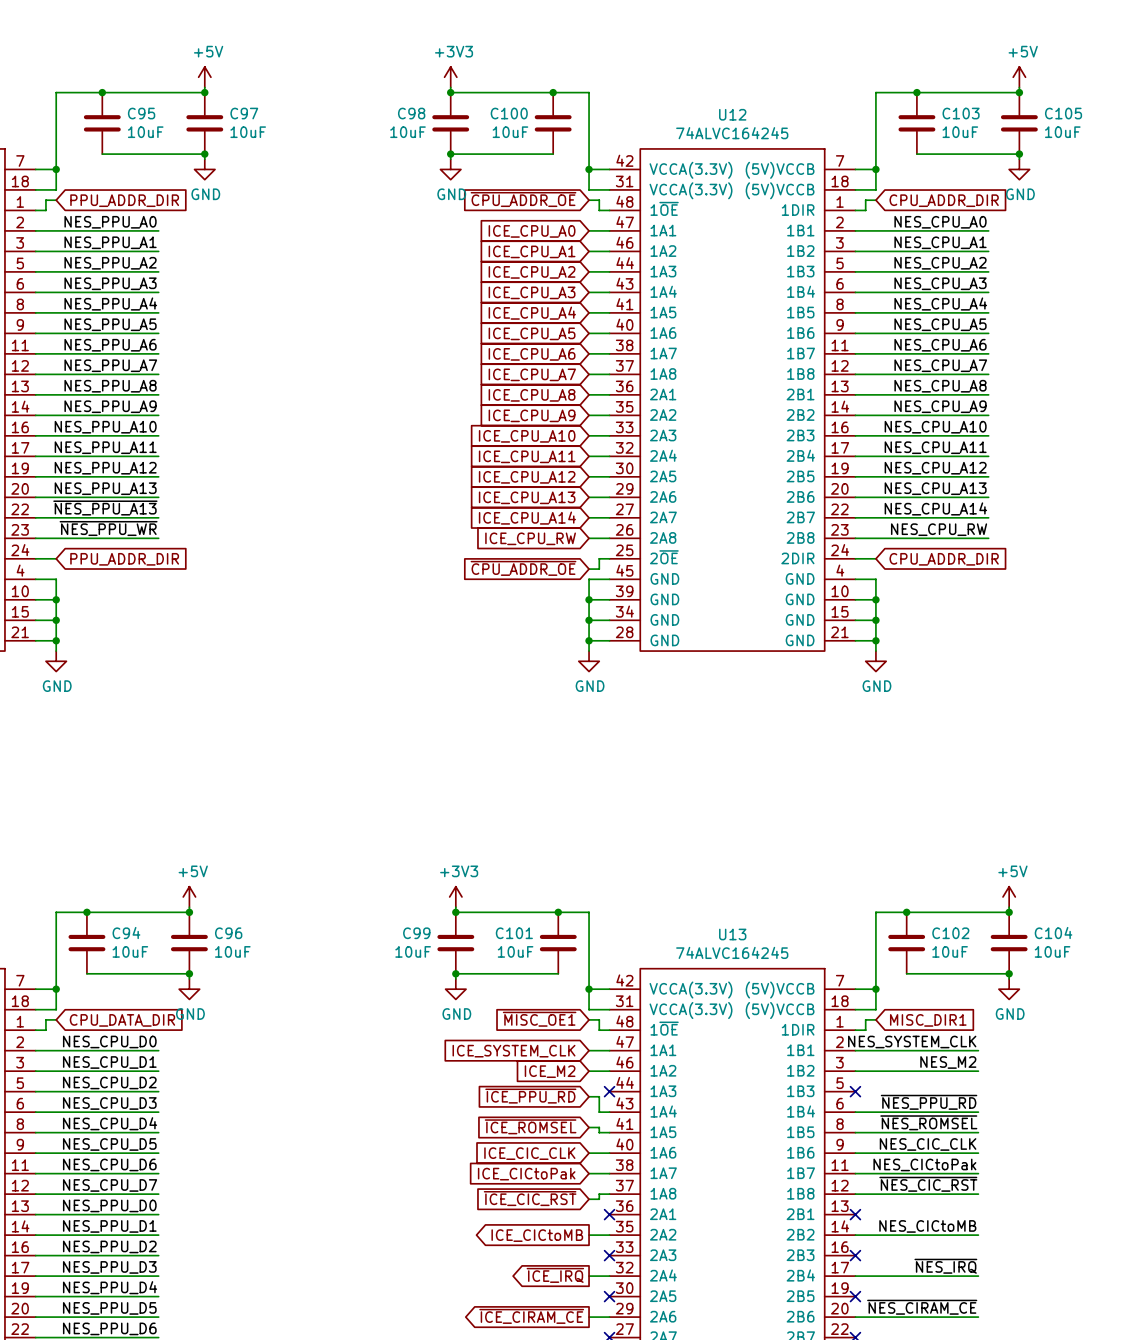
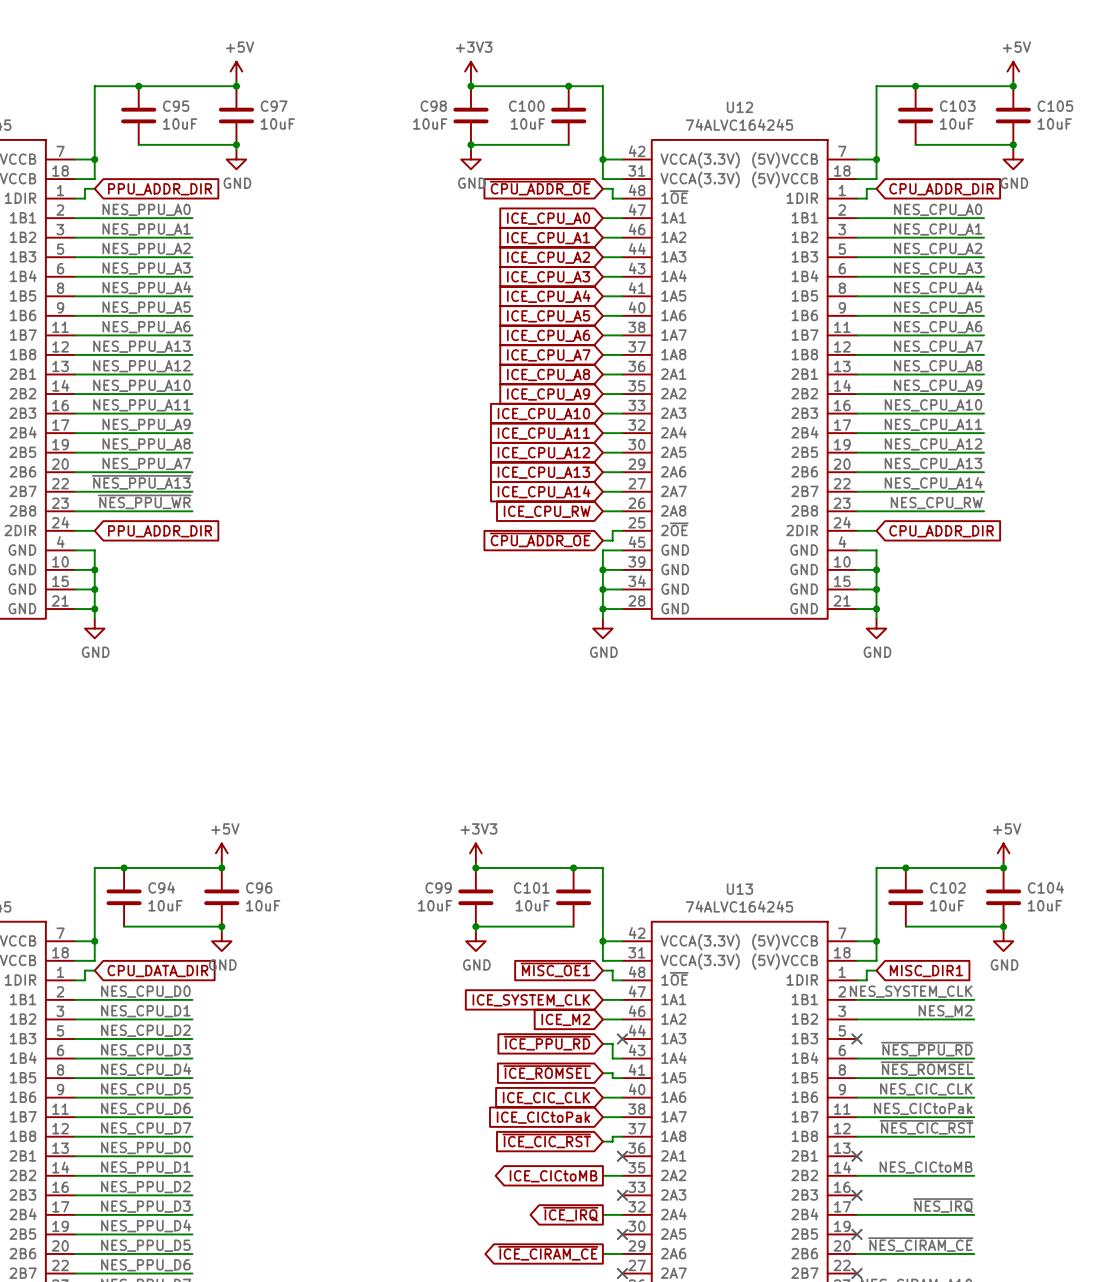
label: NES_PPU_A7 (110, 365) -> NES_PPU_A13 (141, 346)
label: NES_PPU_A8 (110, 386) -> NES_PPU_A12 (141, 366)
label: NES_PPU_A9 (110, 406) -> NES_PPU_A10 (141, 385)
label: NES_PPU_A10 (105, 427) -> NES_PPU_A11 (141, 405)
label: NES_PPU_A11 (105, 447) -> NES_PPU_A9 (146, 424)
label: NES_PPU_A12 (105, 468) -> NES_PPU_A8 (146, 444)
label: NES_PPU_A13 (105, 488) -> NES_PPU_A7 (146, 463)

